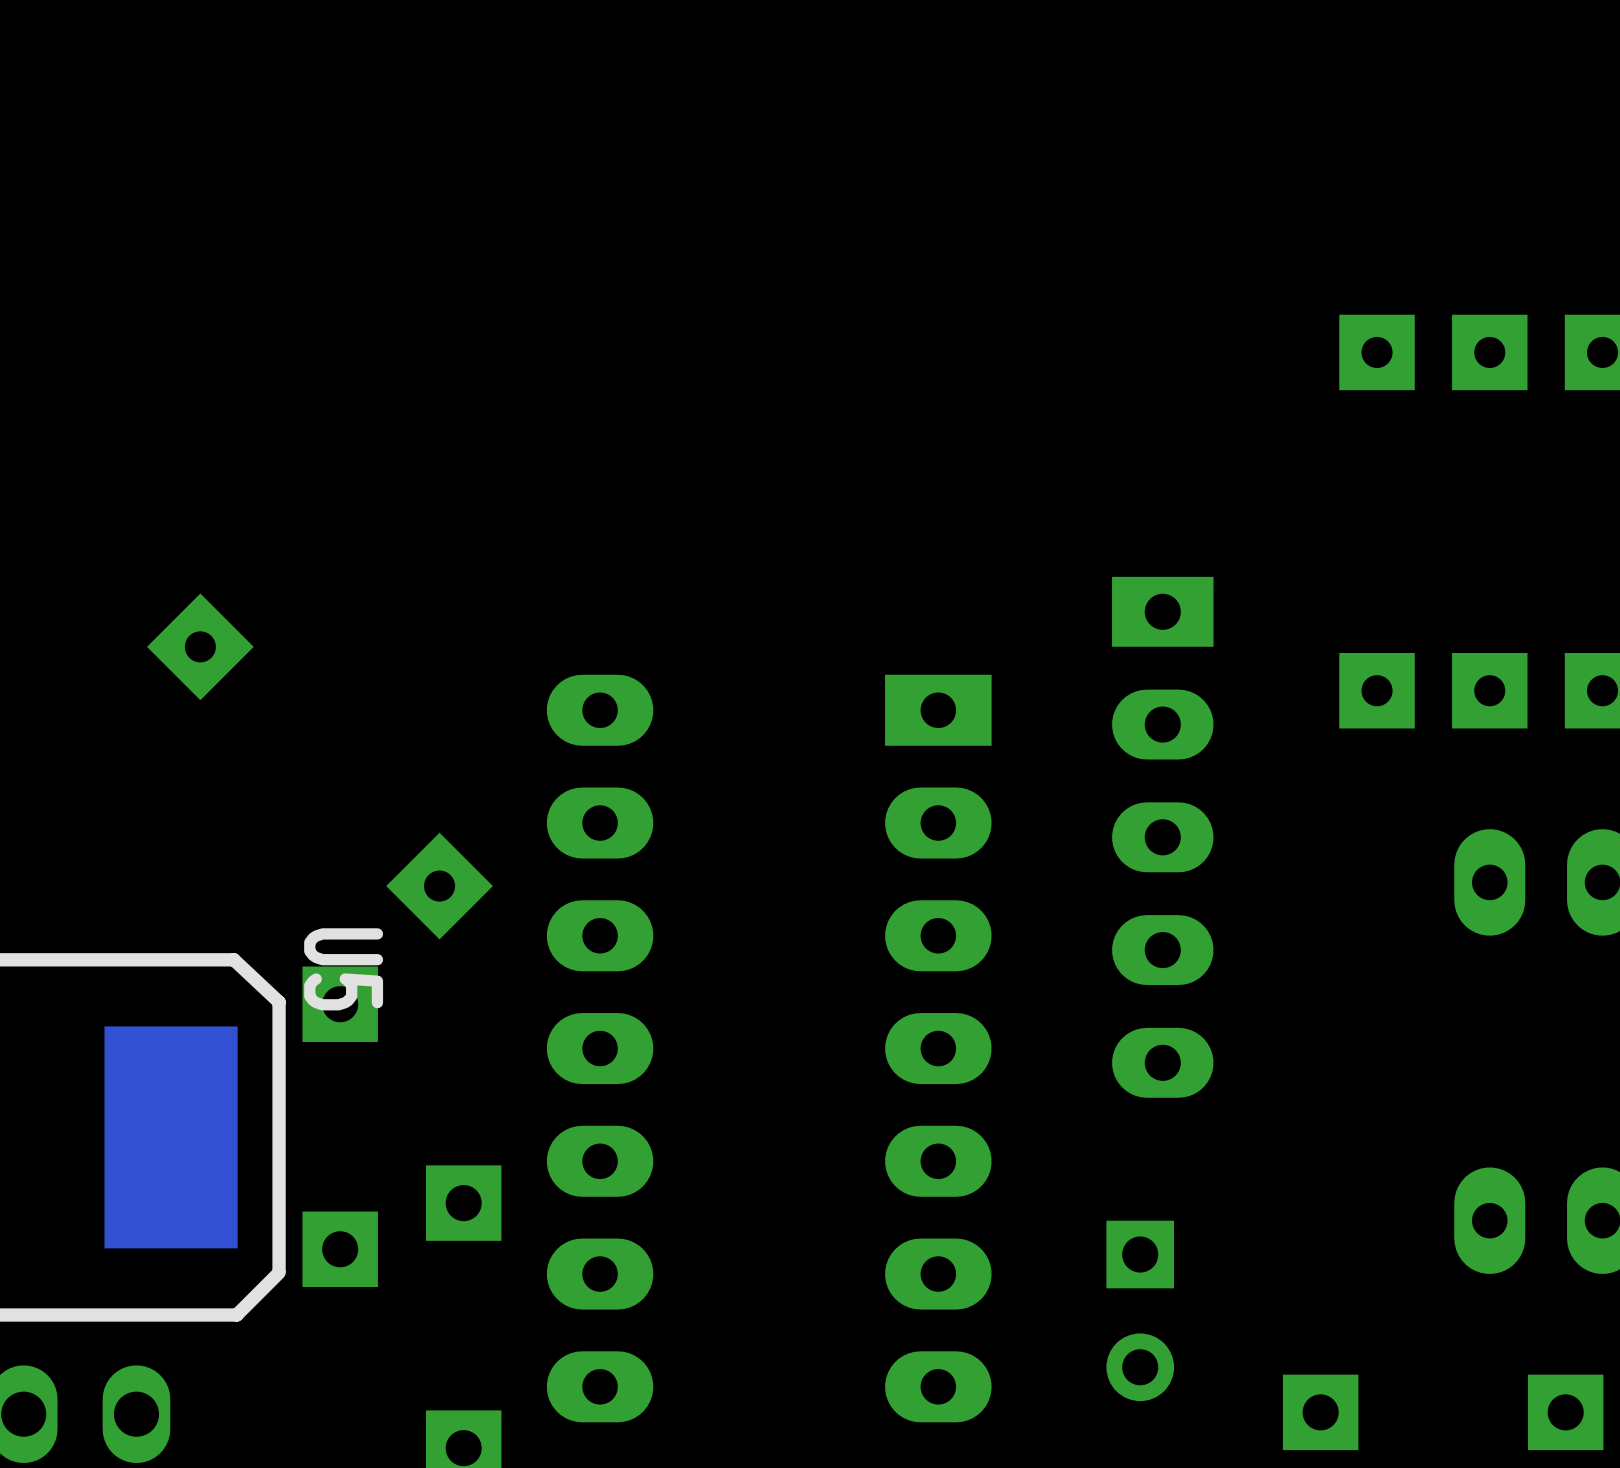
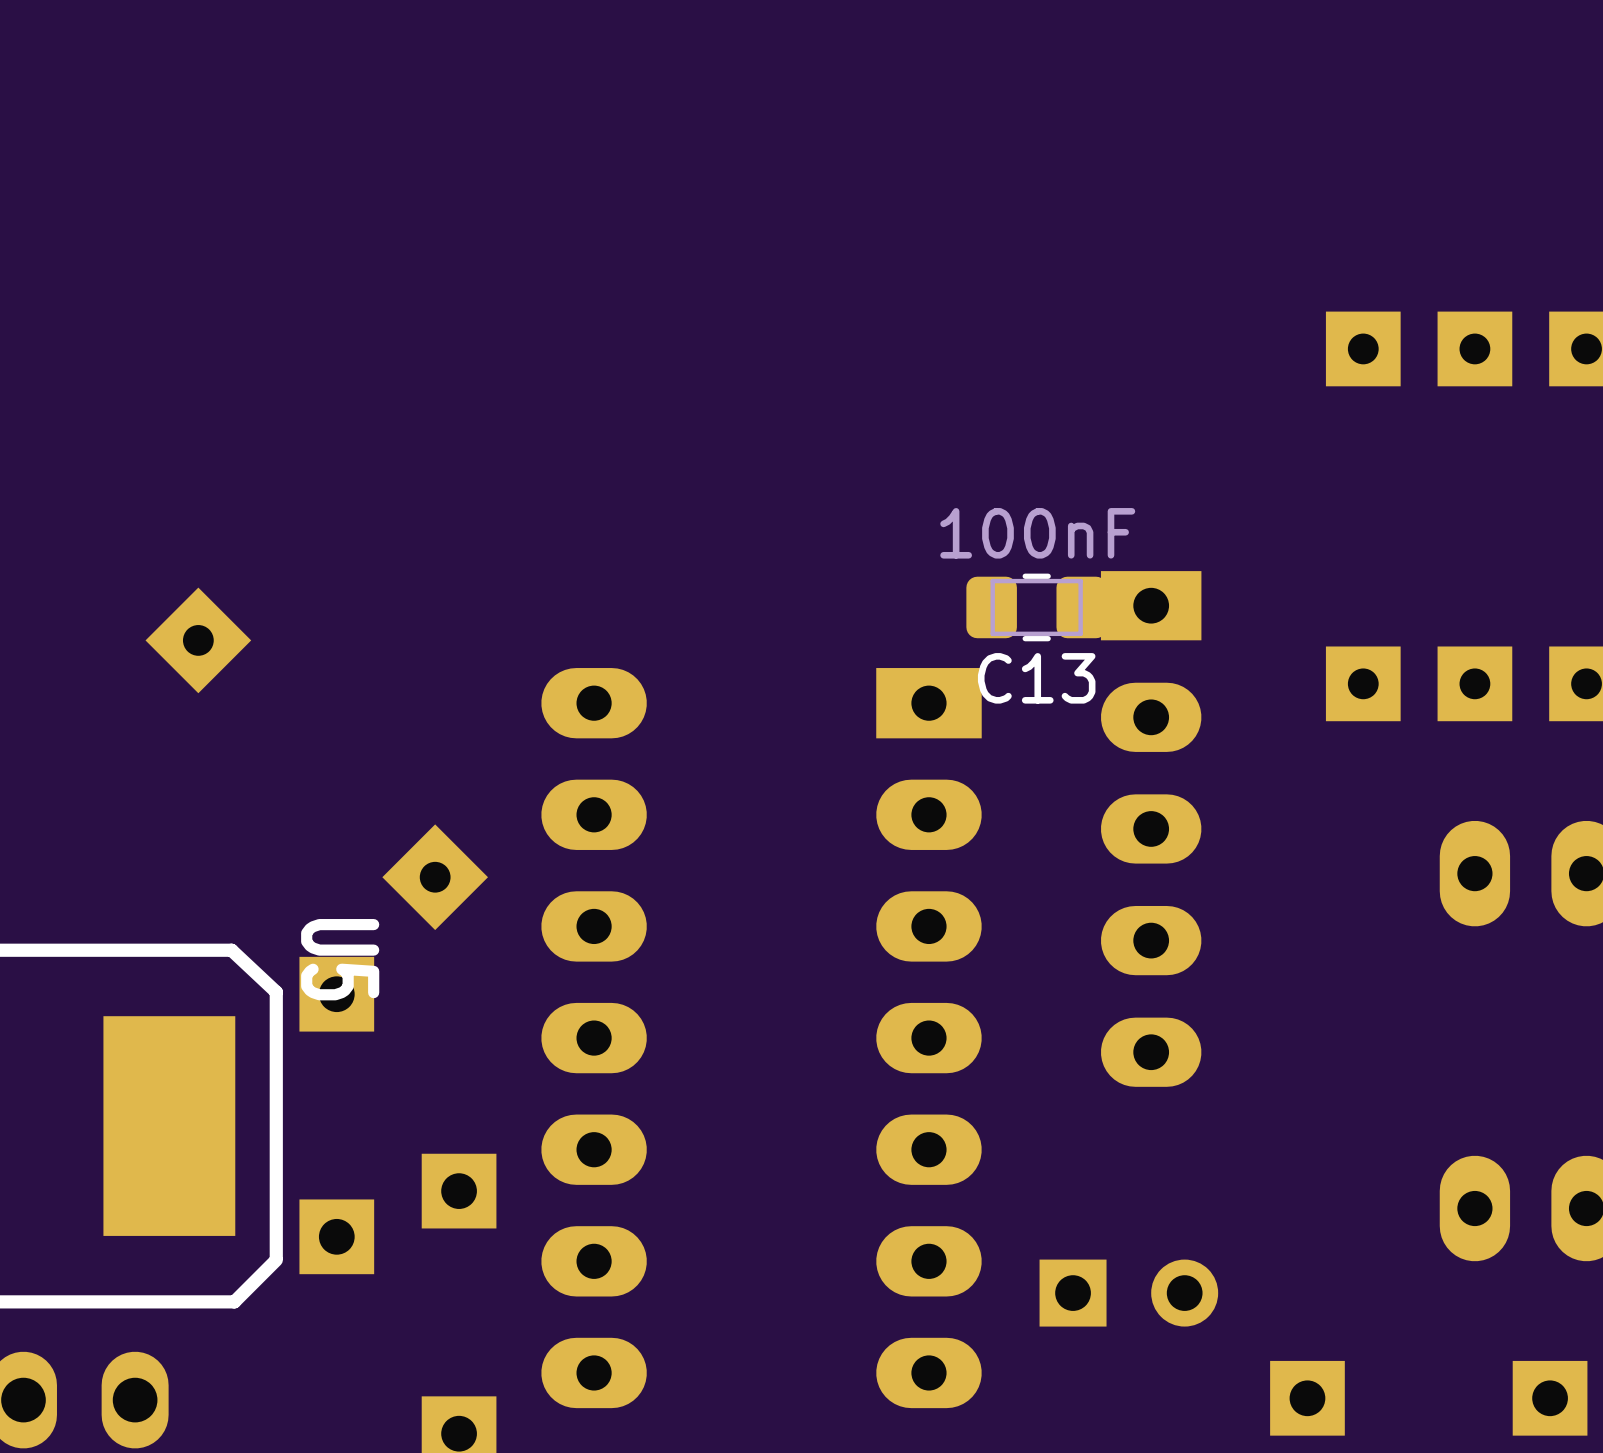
C13: none -> 100nF (1036, 607)
part rotation: 0° (1140, 1310) -> 90° counterclockwise (1128, 1293)

